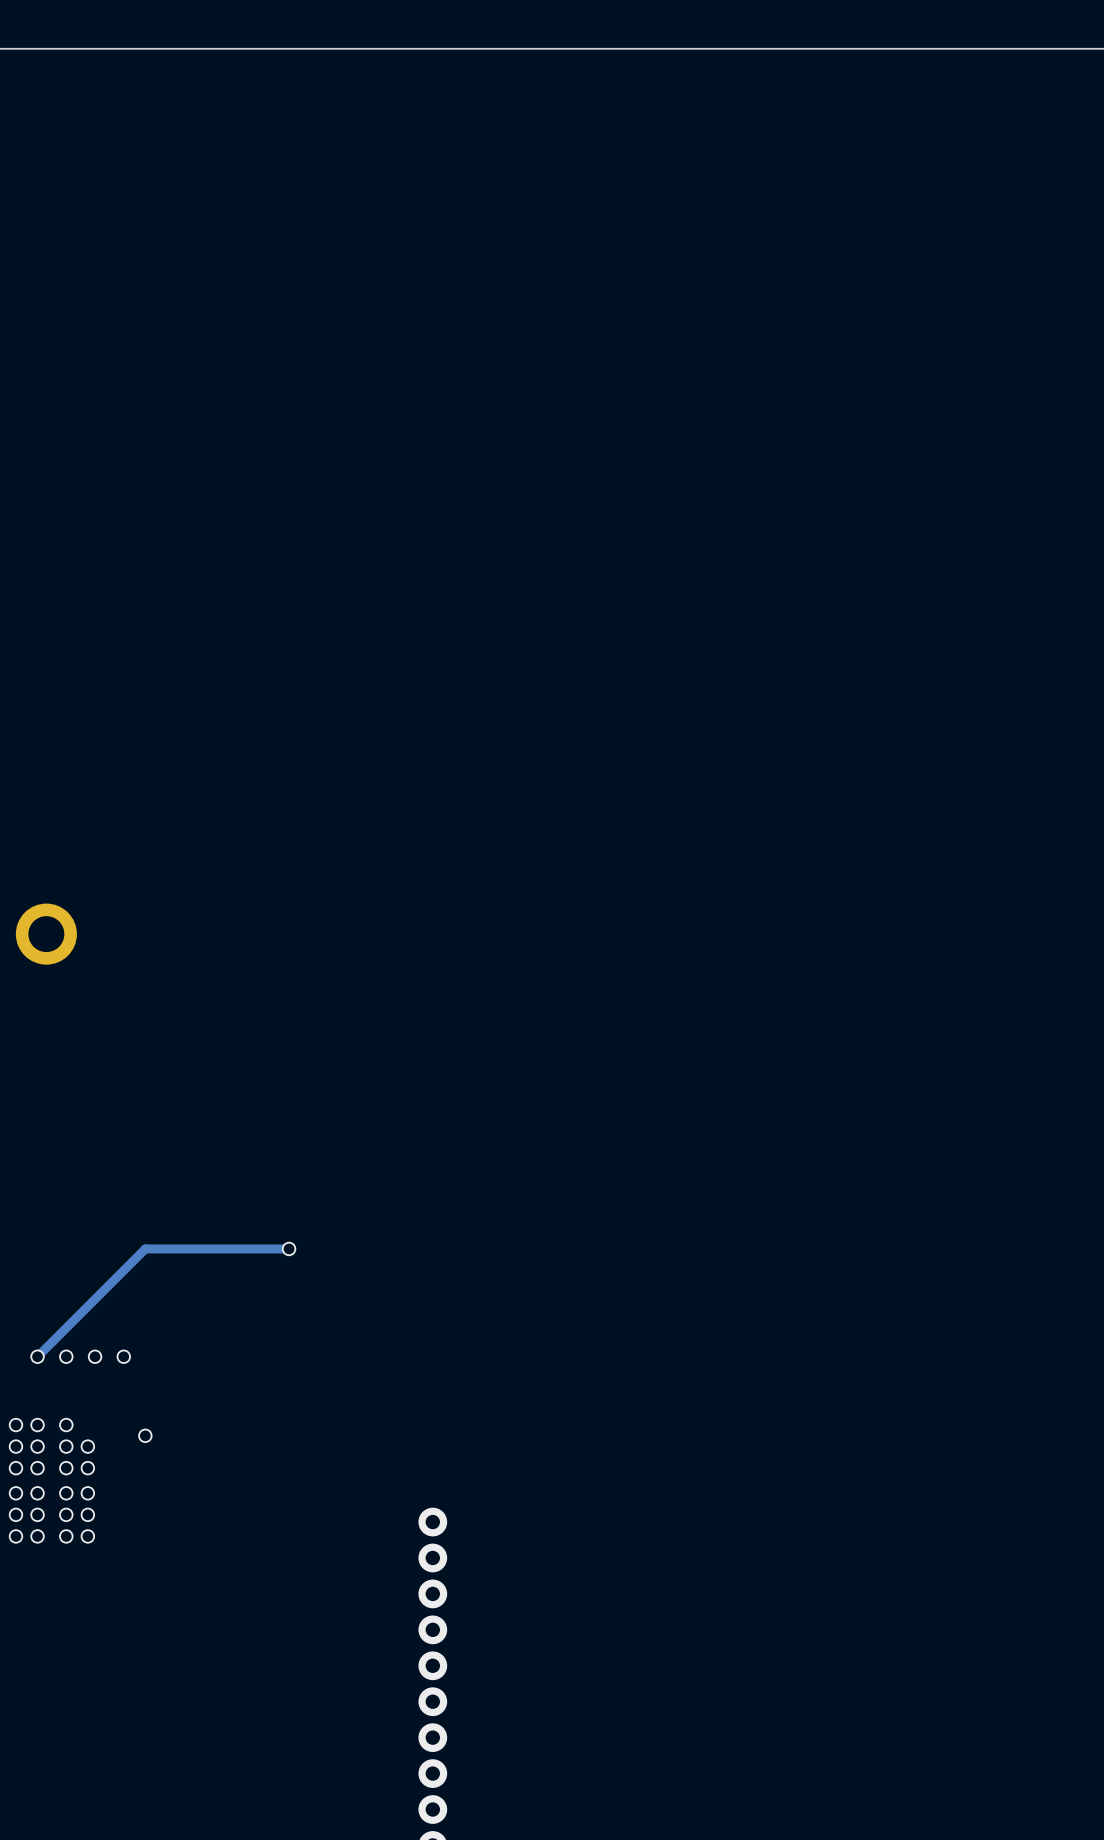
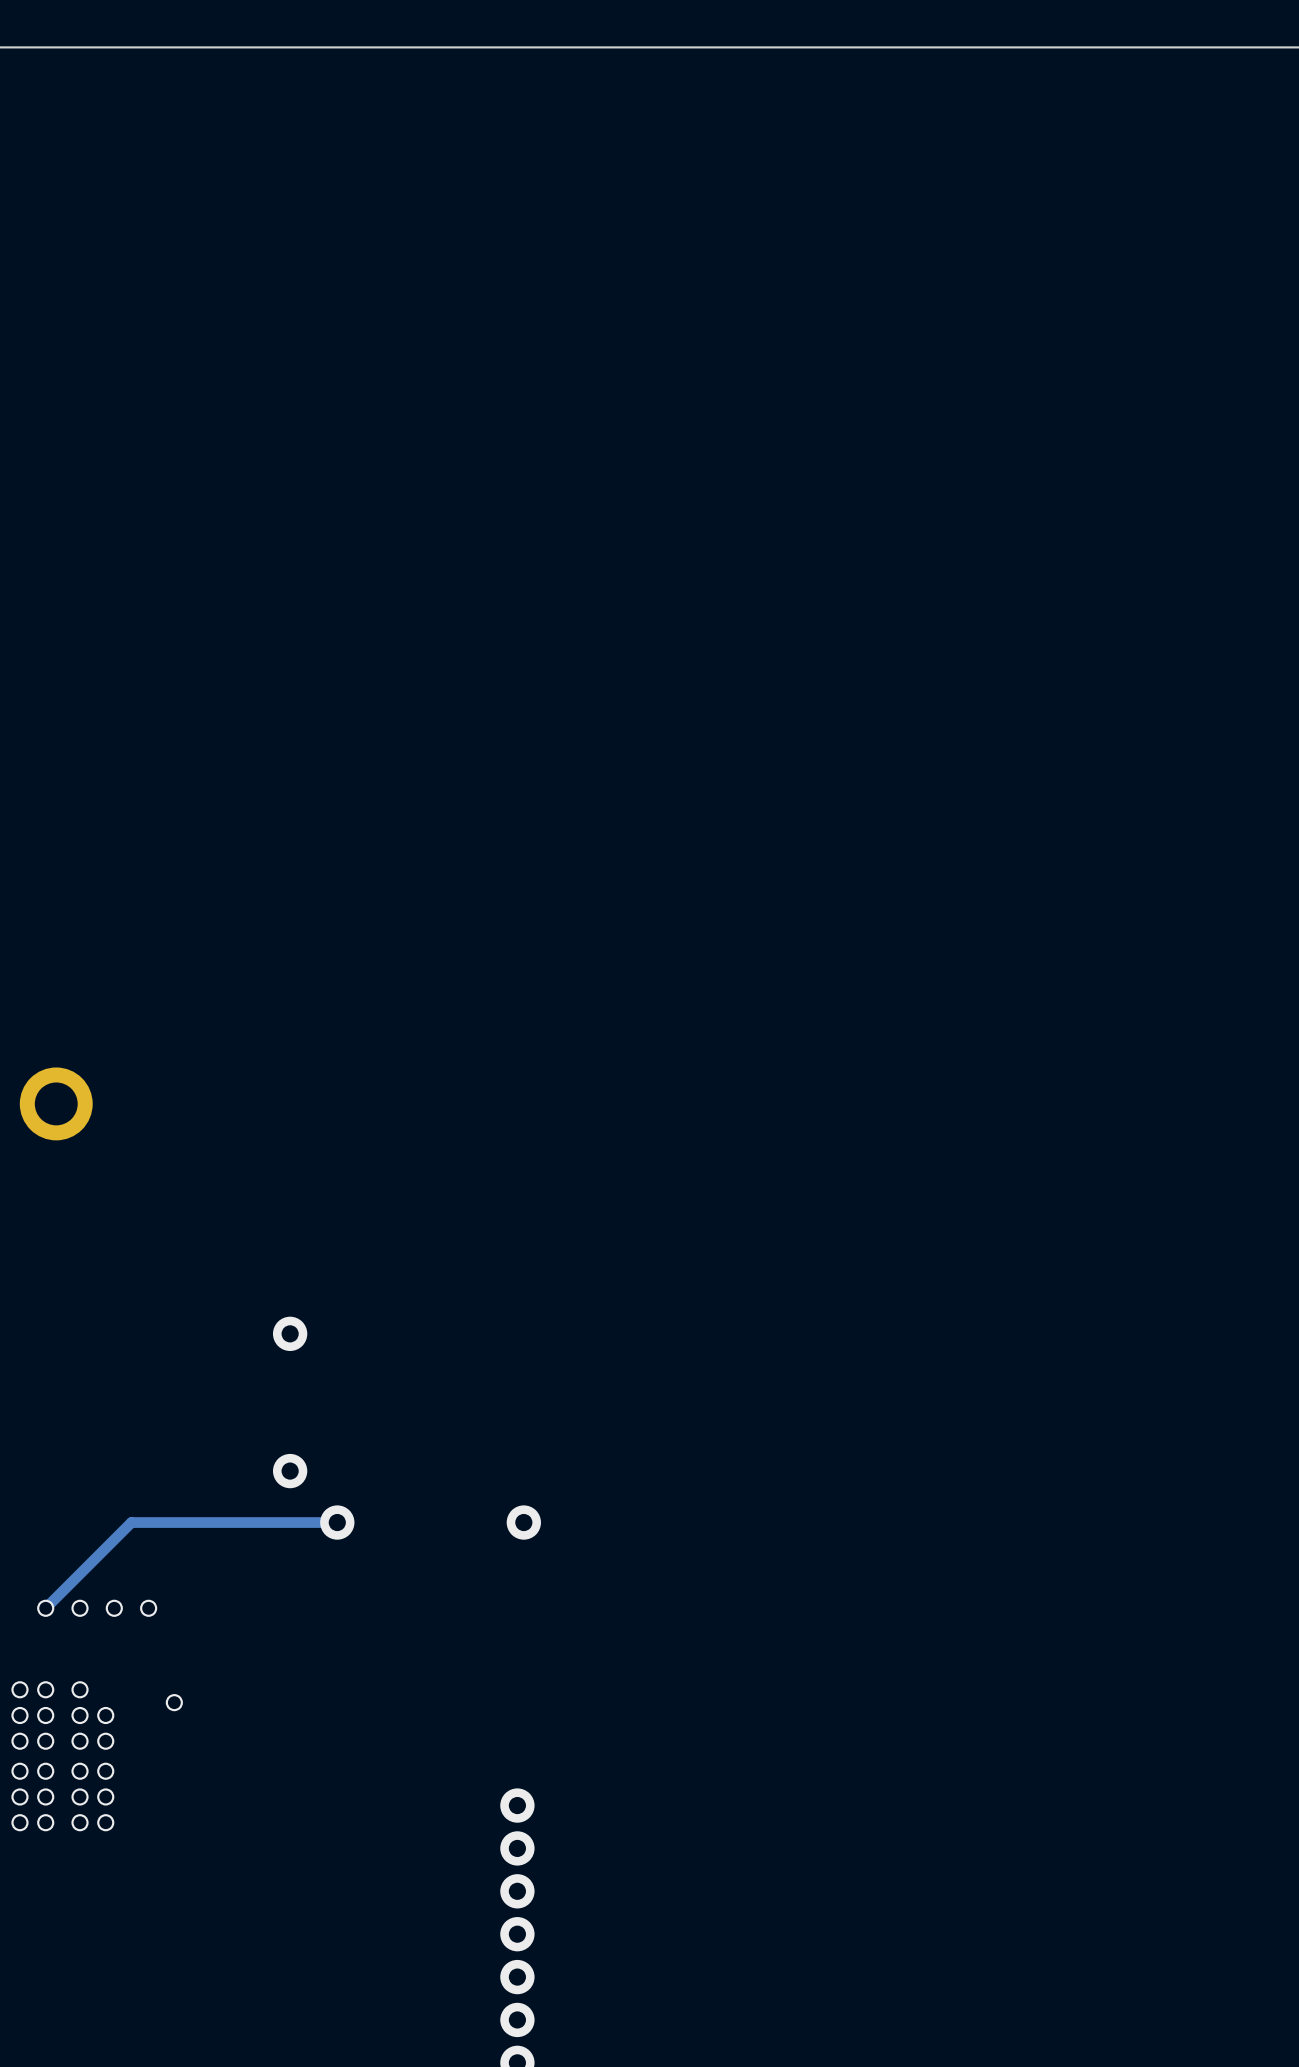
via: none -> (290, 1333)
via: none -> (290, 1471)
track: (289, 1248) (145, 1248) (109, 1284) -> (337, 1522) (131, 1522)
via: (289, 1248) -> none
via: none -> (337, 1522)
via: none -> (523, 1522)

